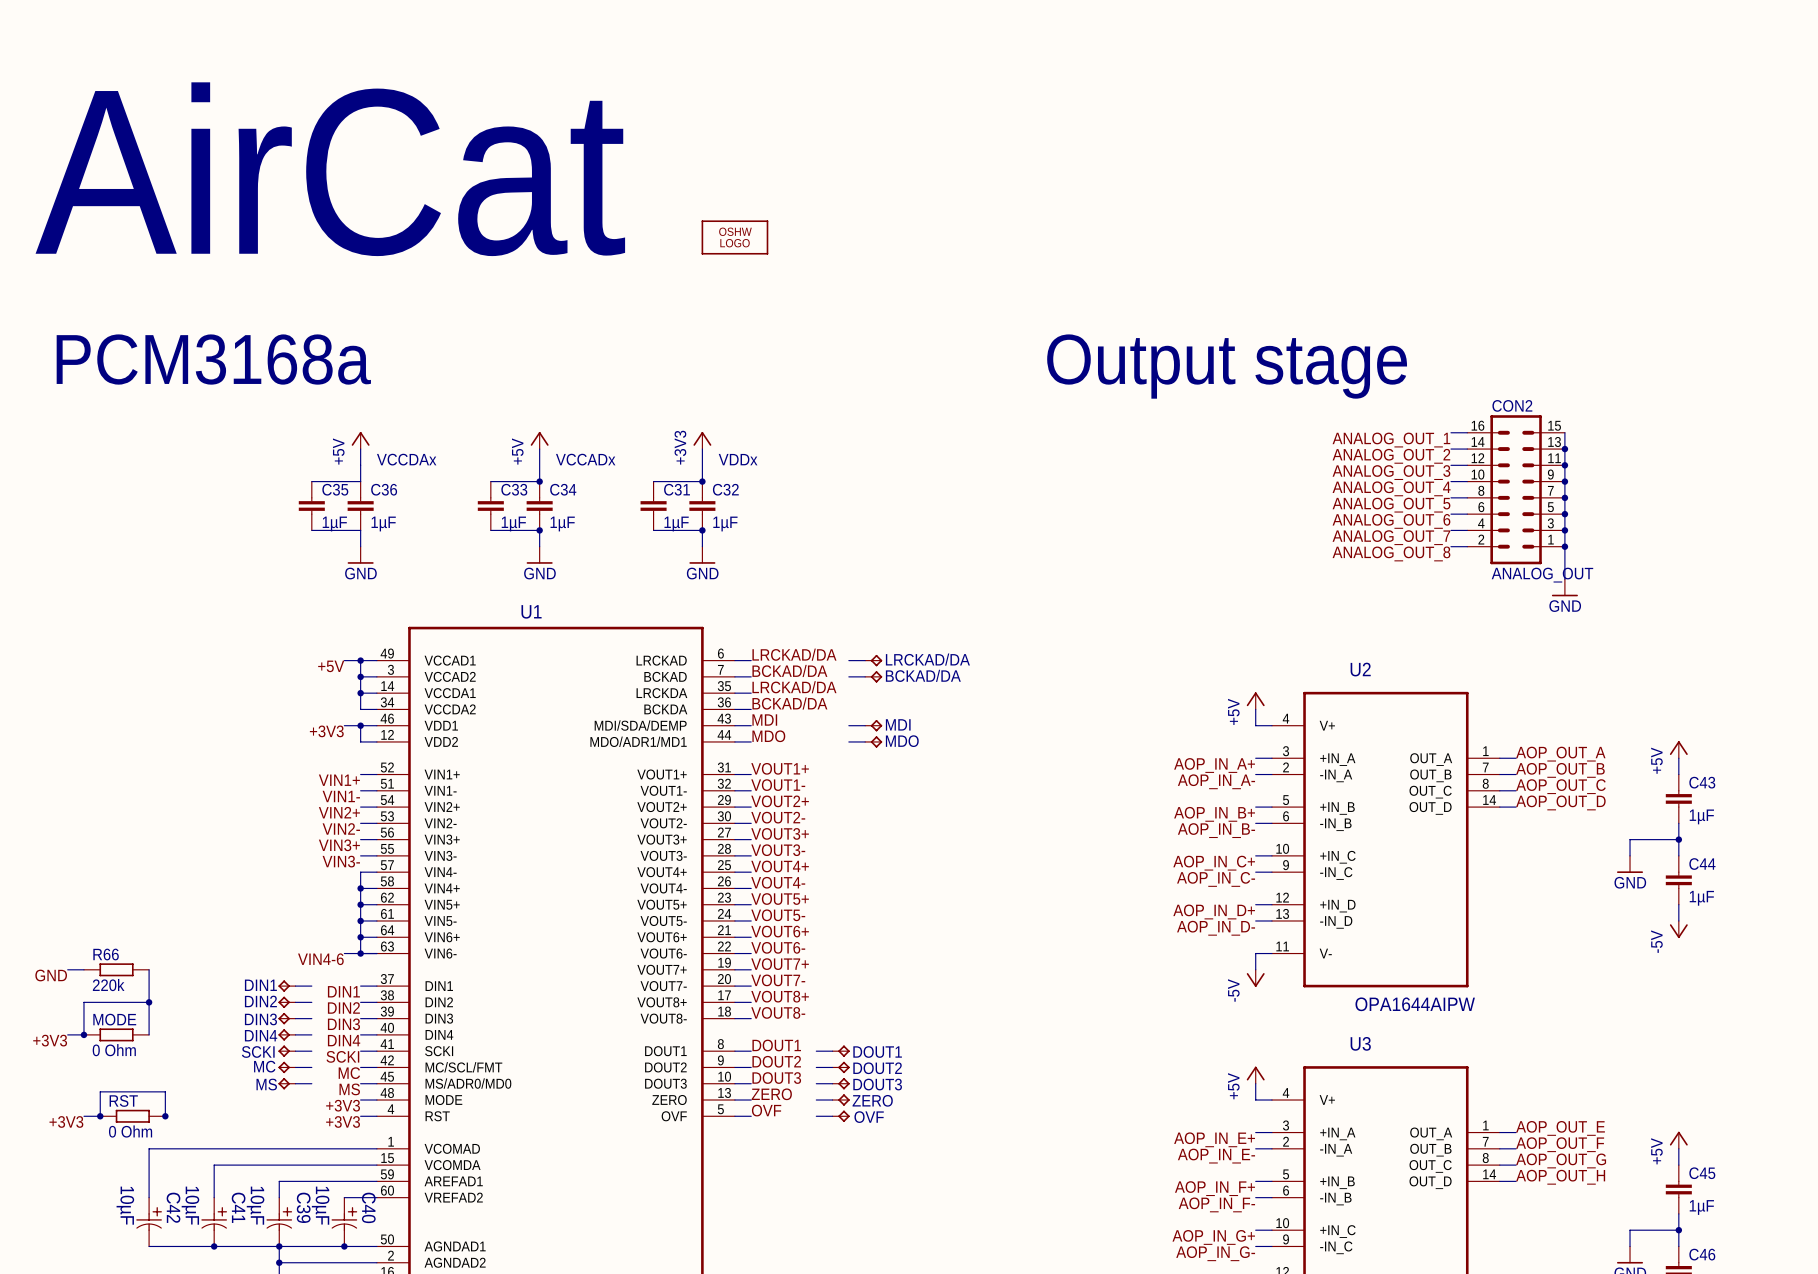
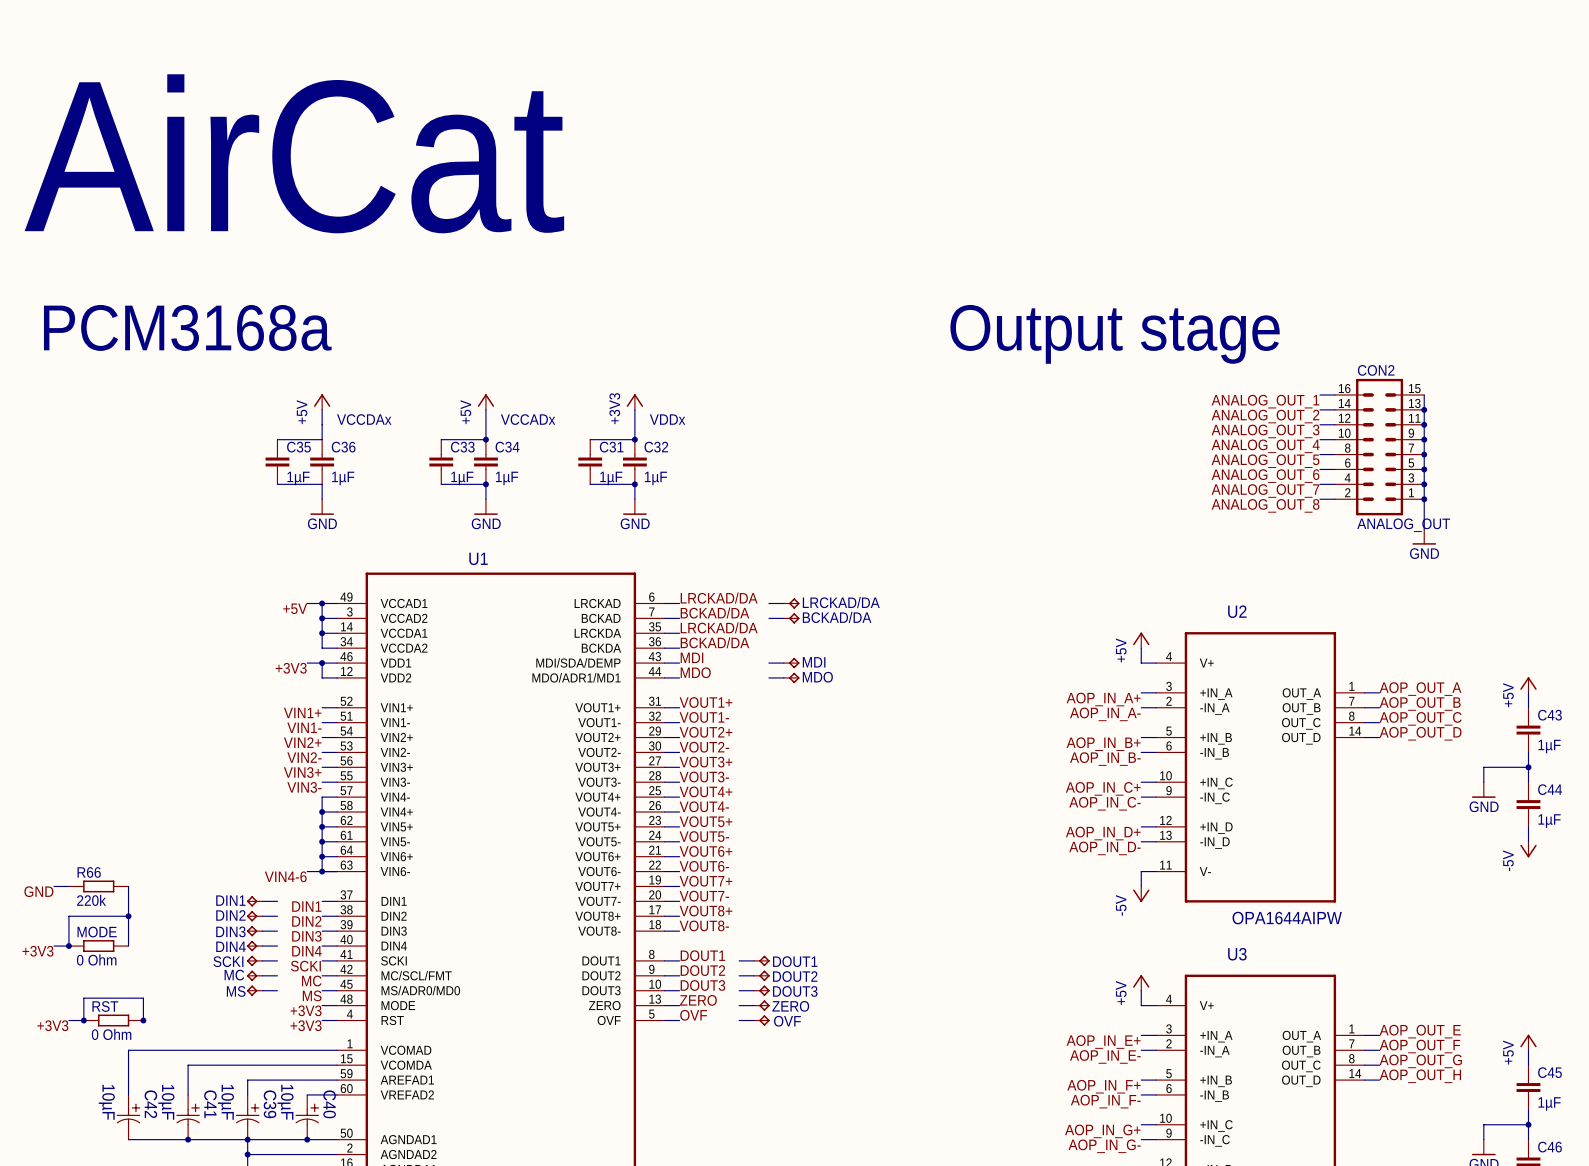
part: (734, 237) -> none

